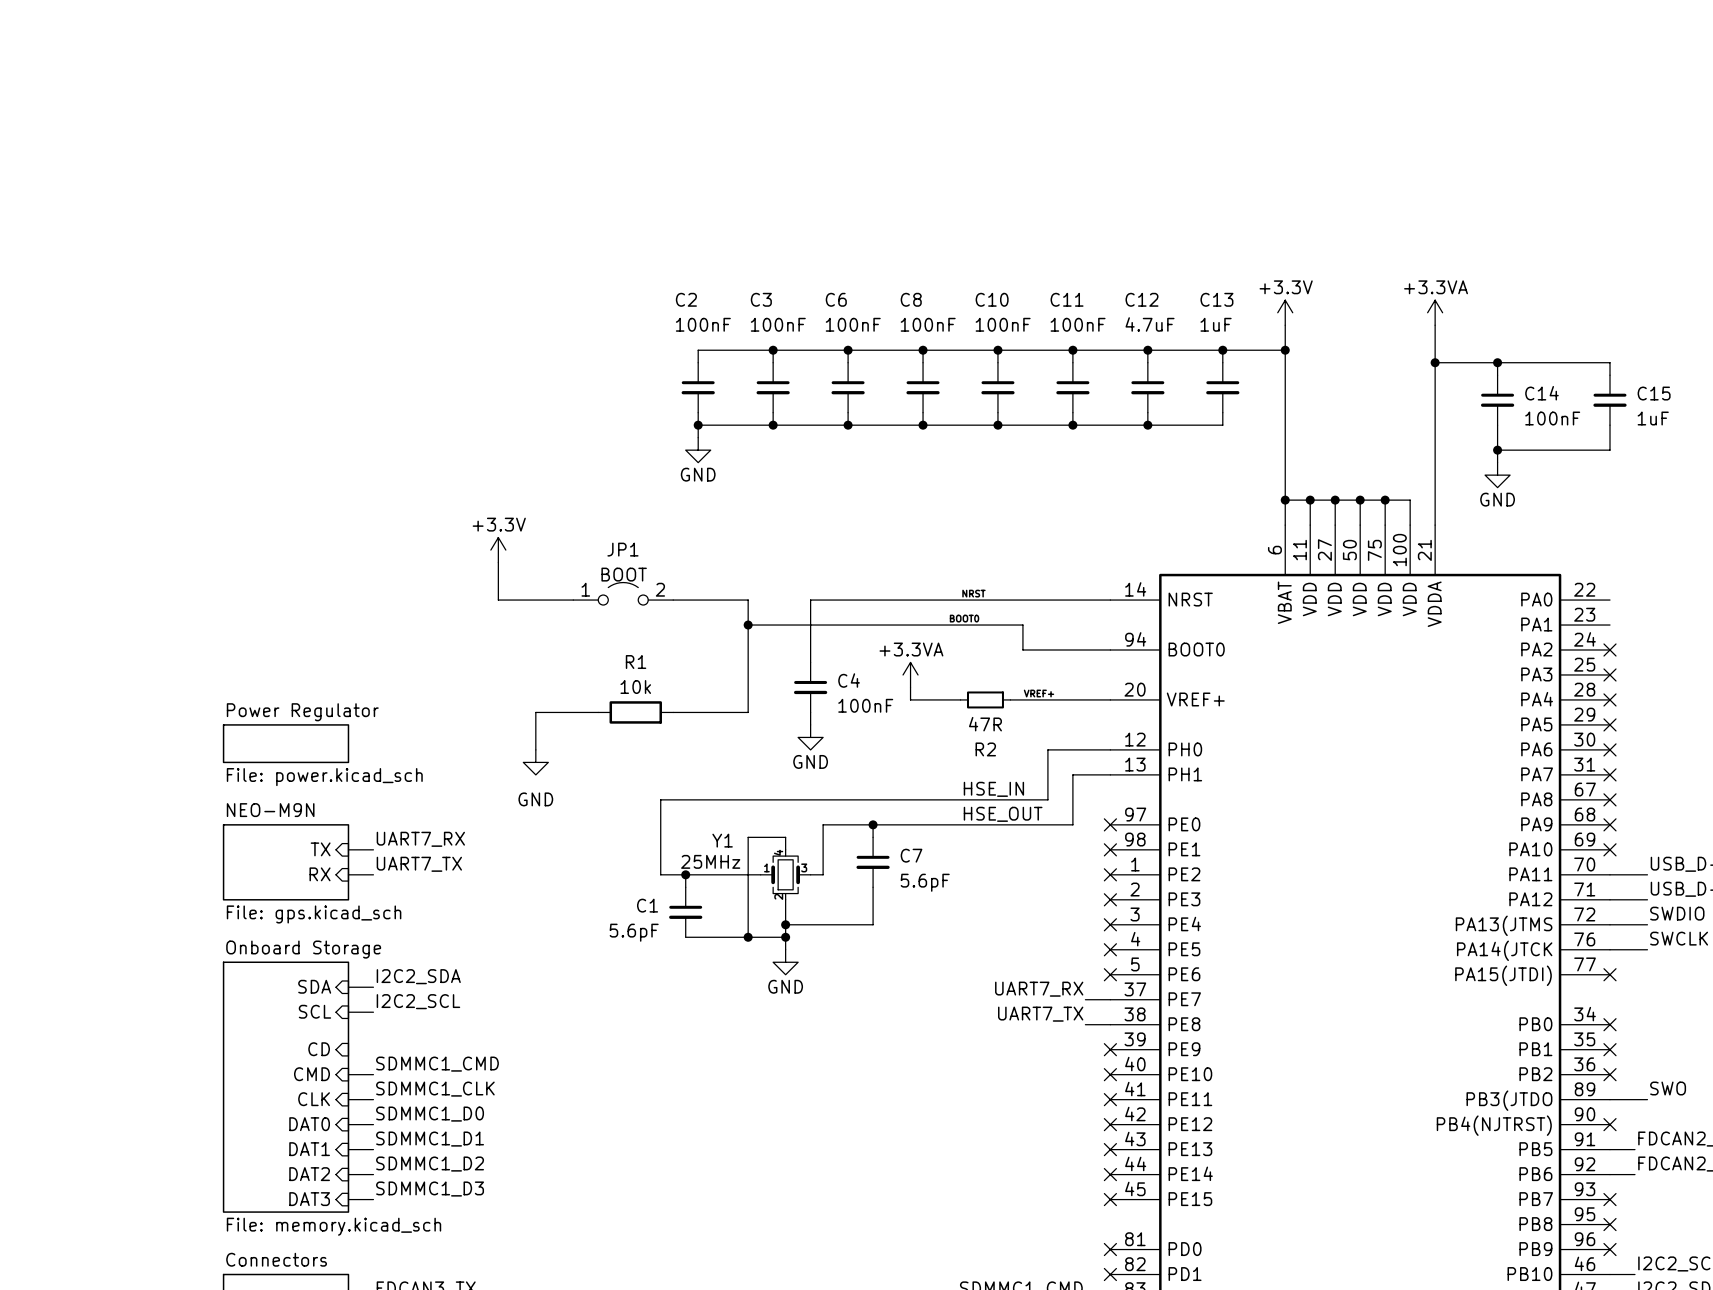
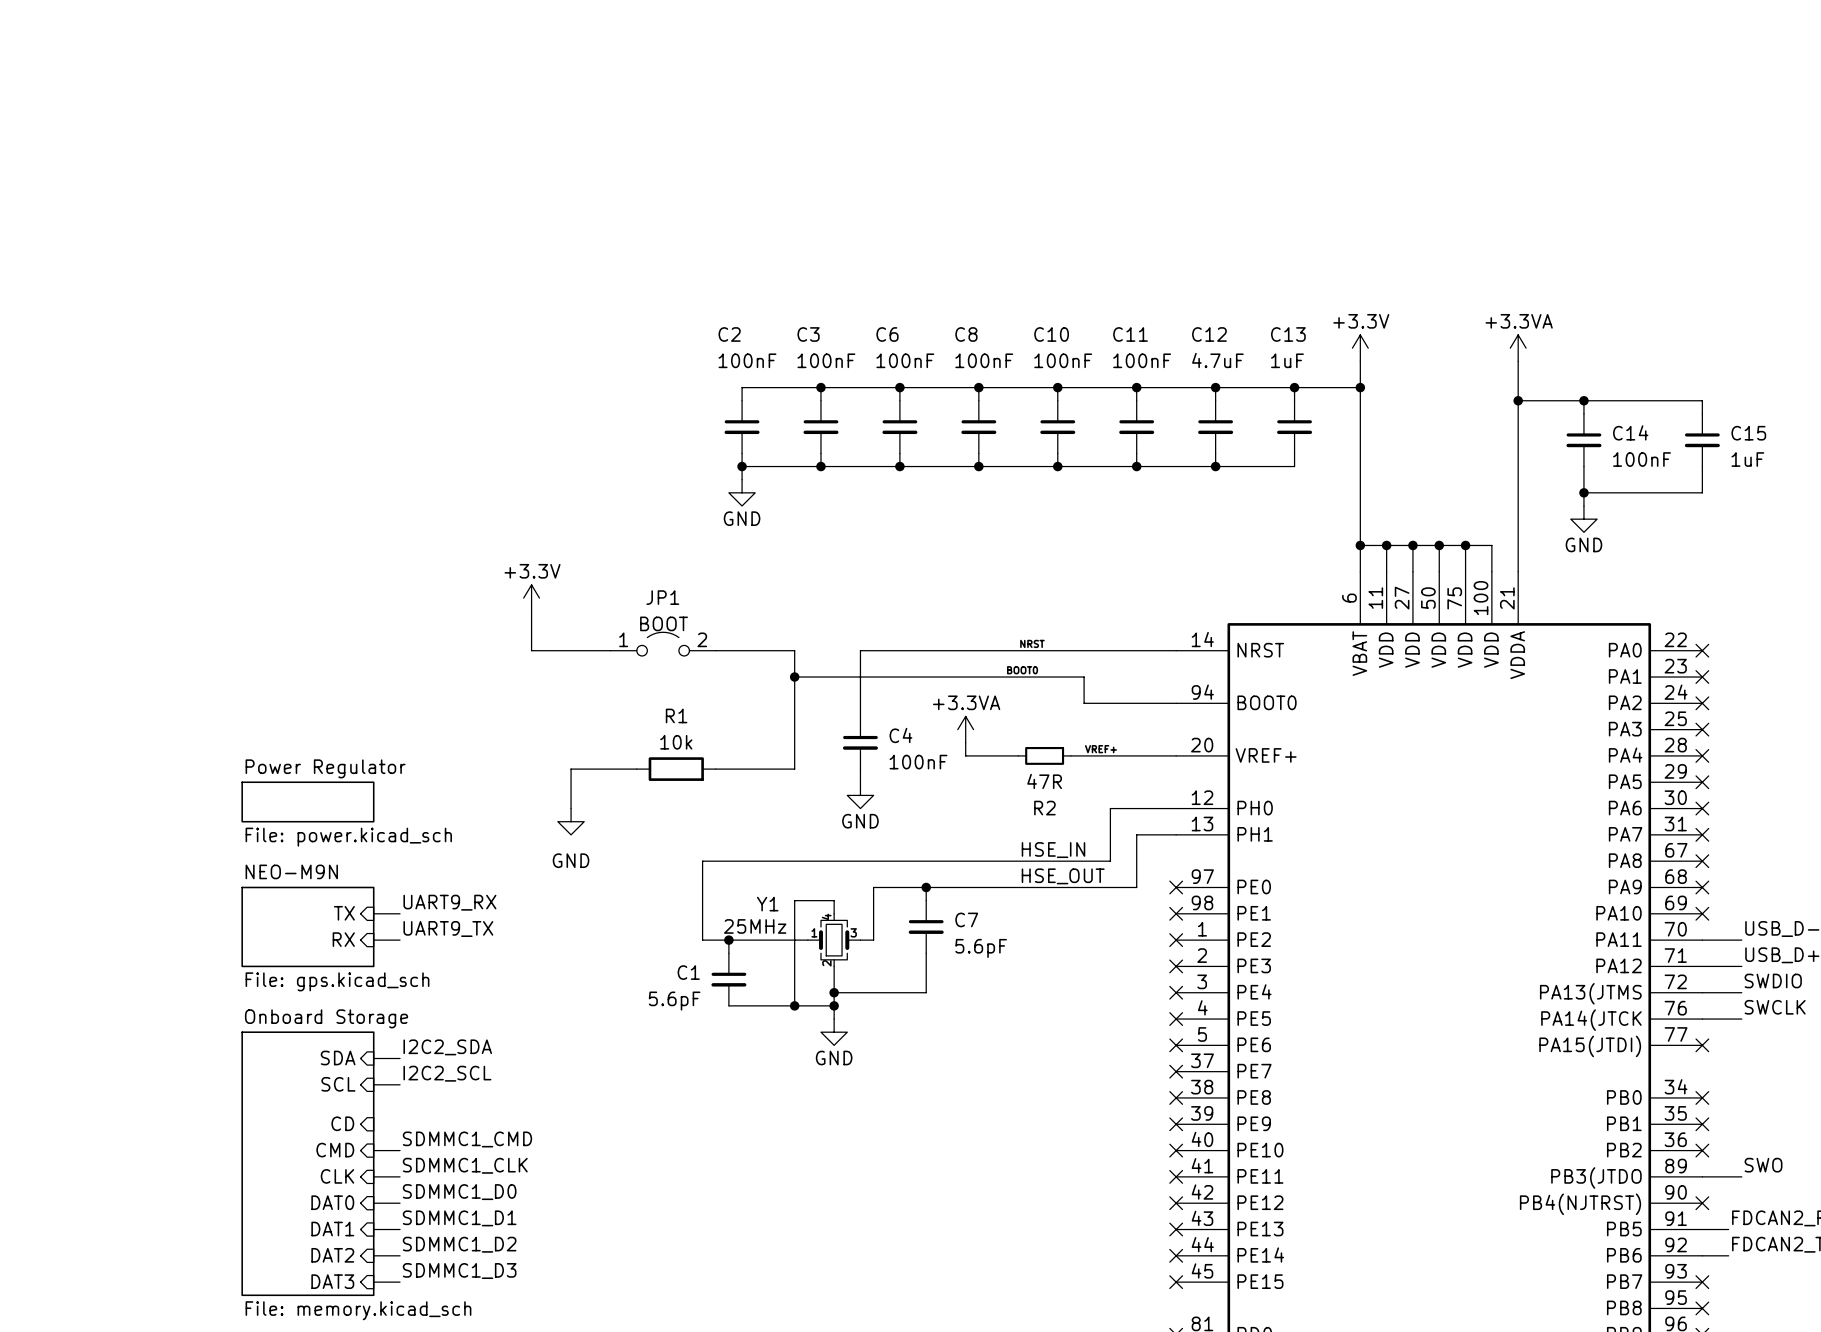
no-connect mark: none -> (1702, 650)
no-connect mark: none -> (1702, 677)
label: UART7_RX (420, 839) -> UART9_RX (449, 902)
label: UART7_TX (419, 864) -> UART9_TX (448, 928)
label: UART7_RX (1039, 989) -> none
wire: (1085, 999) (1110, 999) -> none
no-connect mark: none -> (1176, 1071)
label: UART7_TX (1040, 1014) -> none
wire: (1085, 1024) (1110, 1024) -> none
no-connect mark: none -> (1176, 1097)

